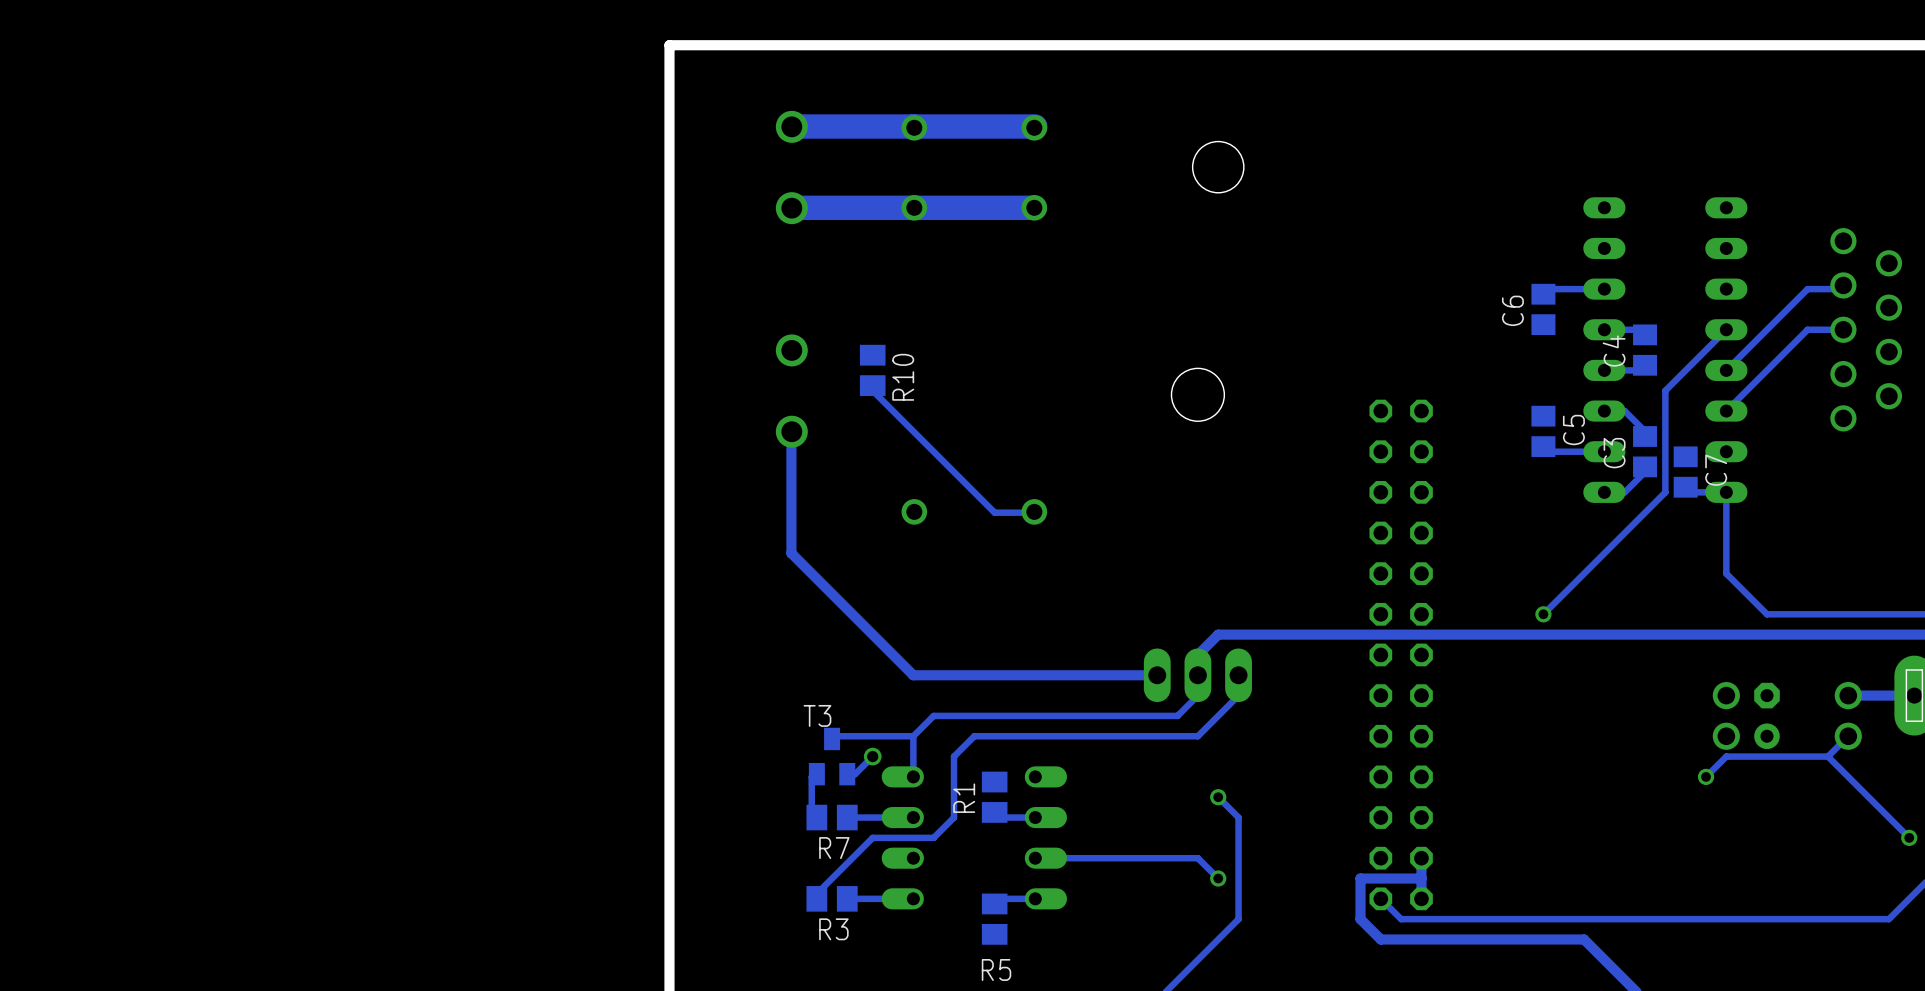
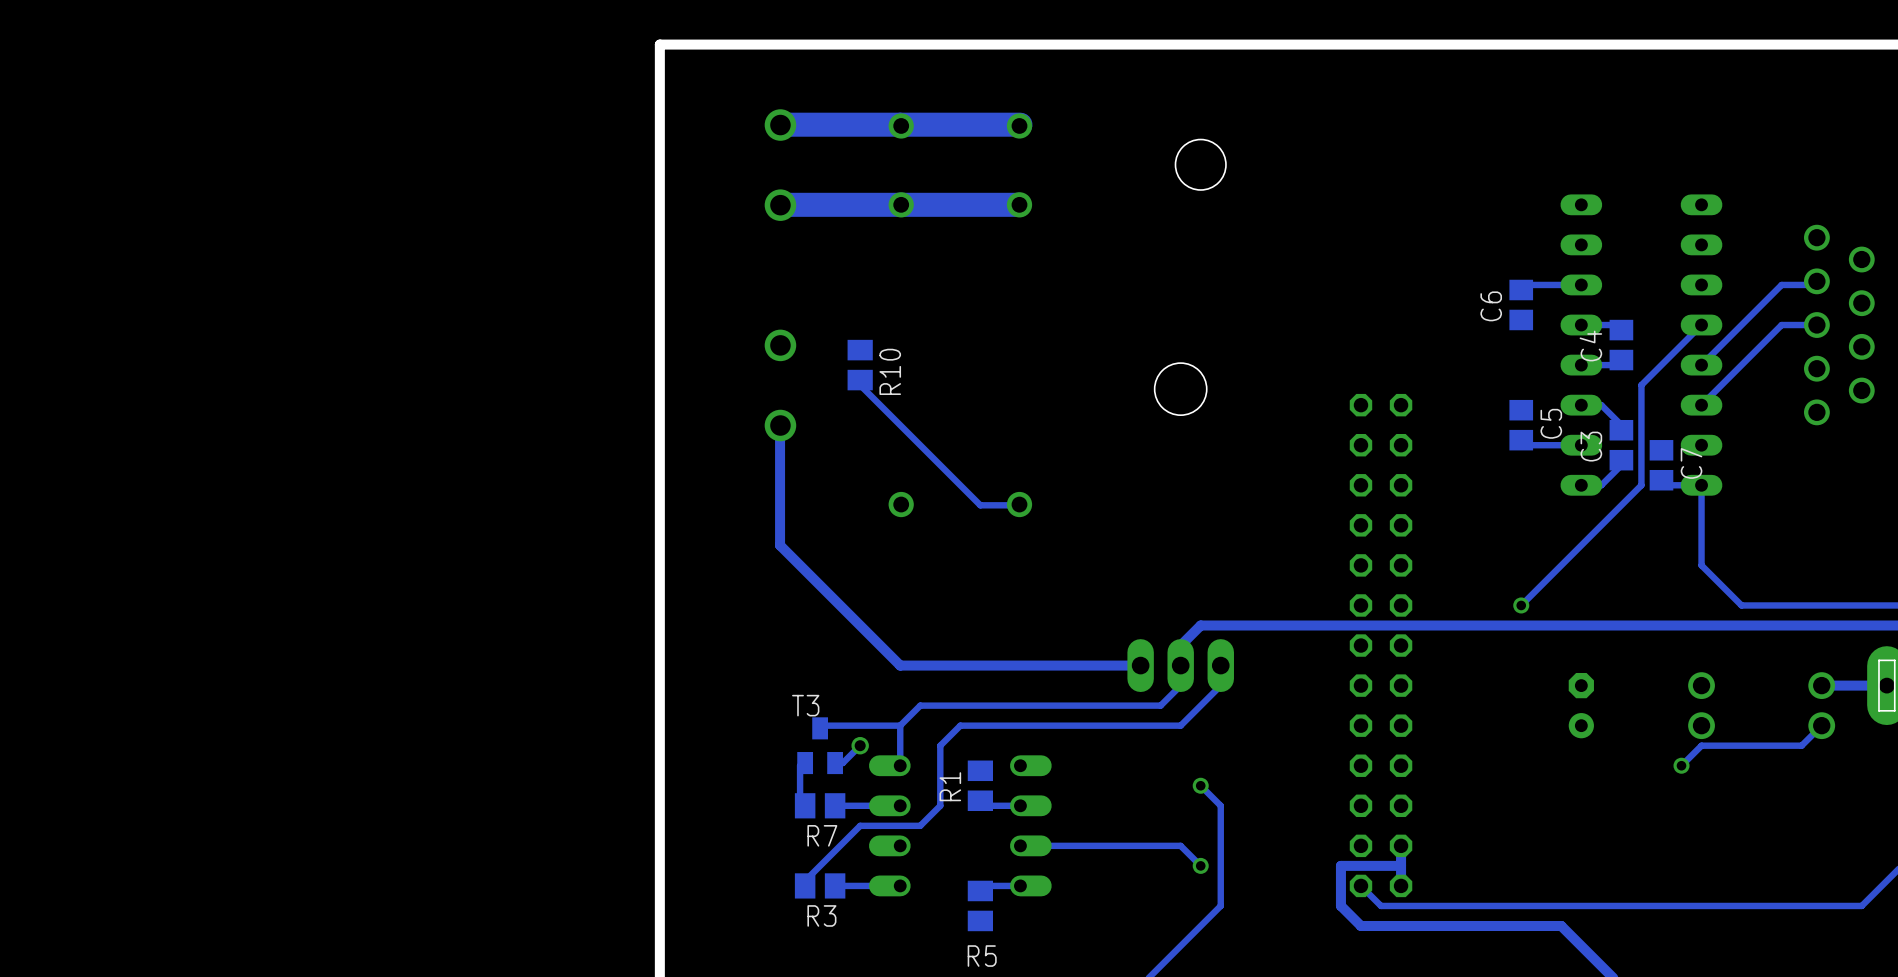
part position: (1766, 715) -> (1581, 705)
track: (1827, 756) (1909, 837) -> none
via: (1909, 837) -> none

